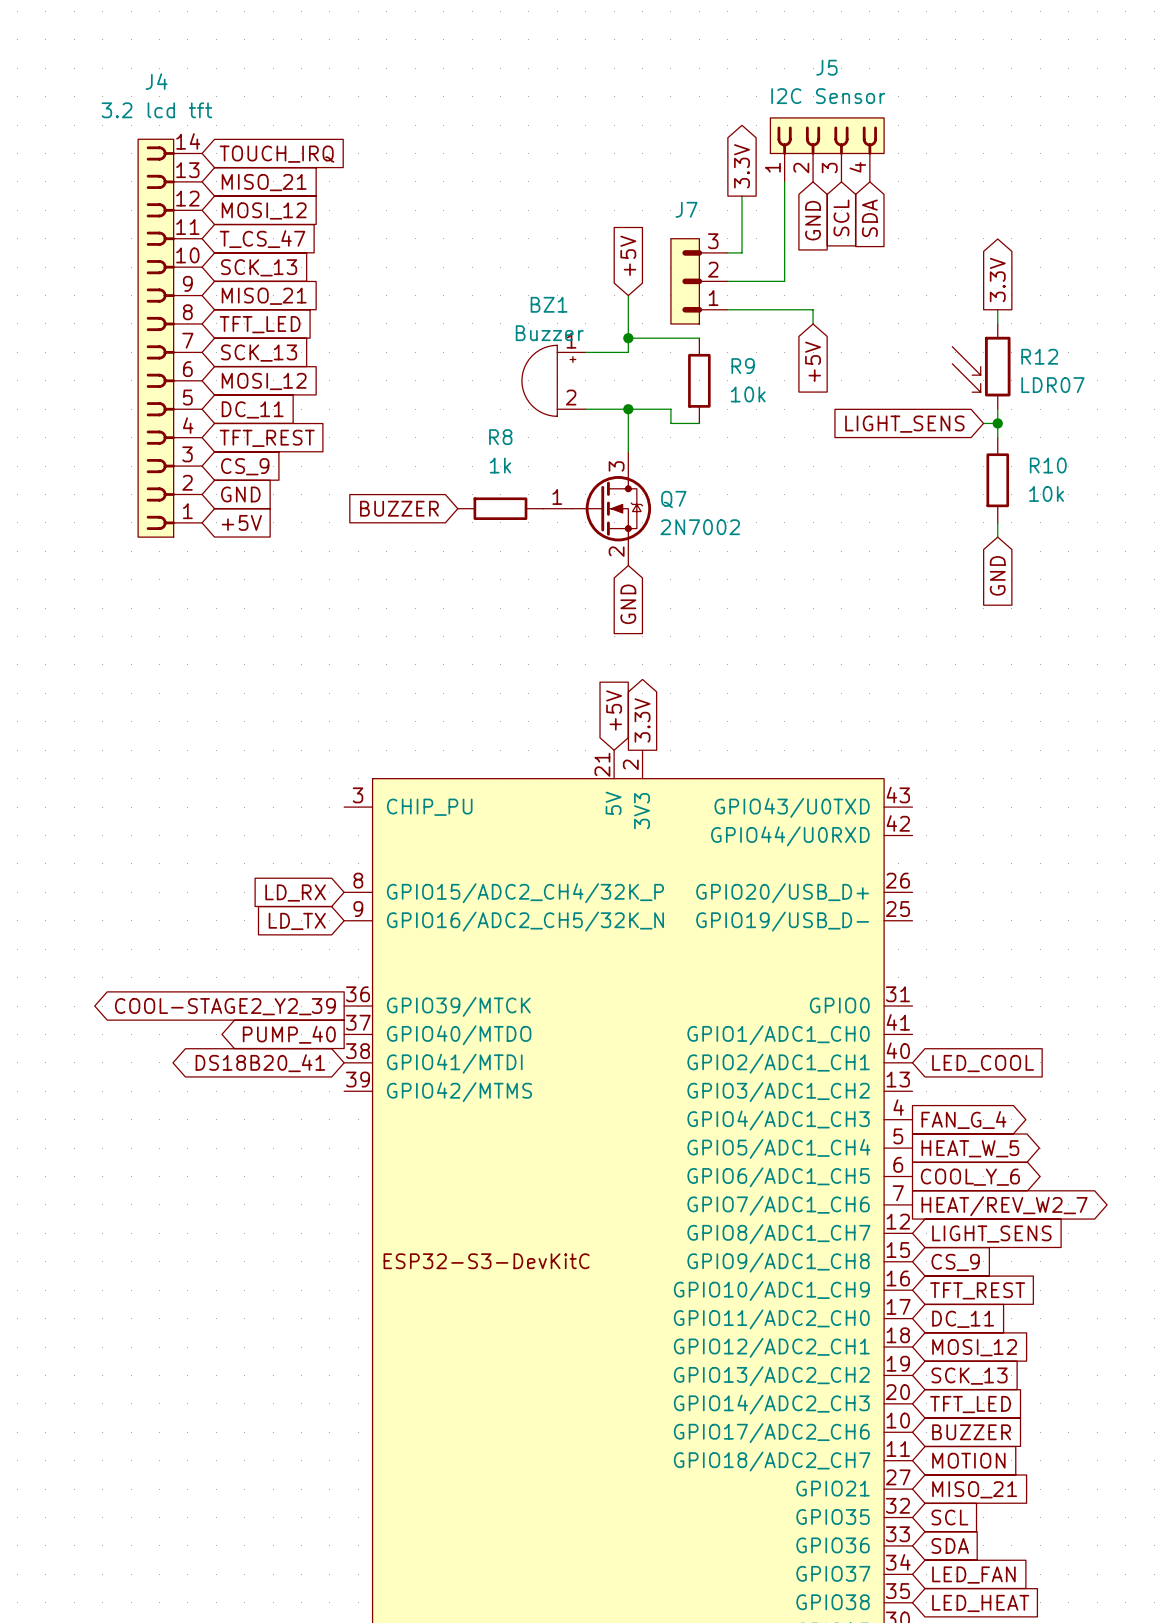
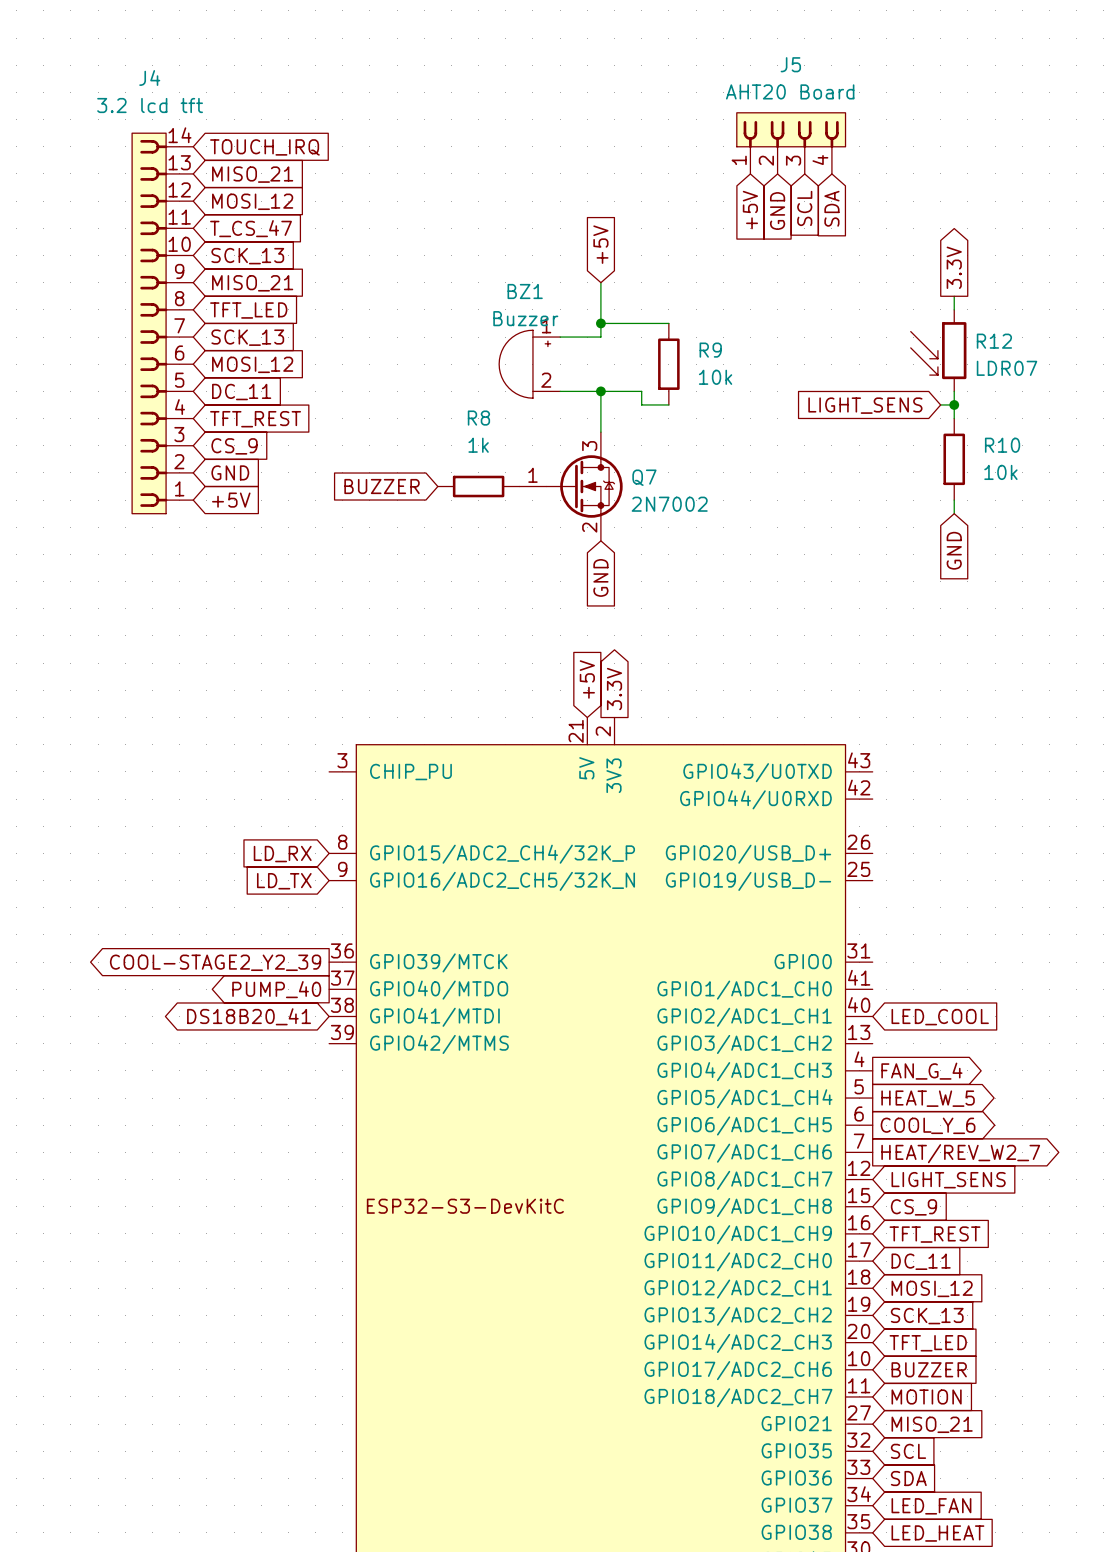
J5 value: I2C Sensor (828, 96) -> AHT20 Board (790, 91)
global label: 3.3V (741, 166) -> none
wire: (784, 181) (784, 281) (727, 281) -> none
wire: (741, 196) (741, 252) (727, 252) -> none
J7: (699, 281) -> none
wire: (727, 309) (813, 309) (813, 323) -> none
global label position: +5V (813, 361) -> +5V (750, 210)

